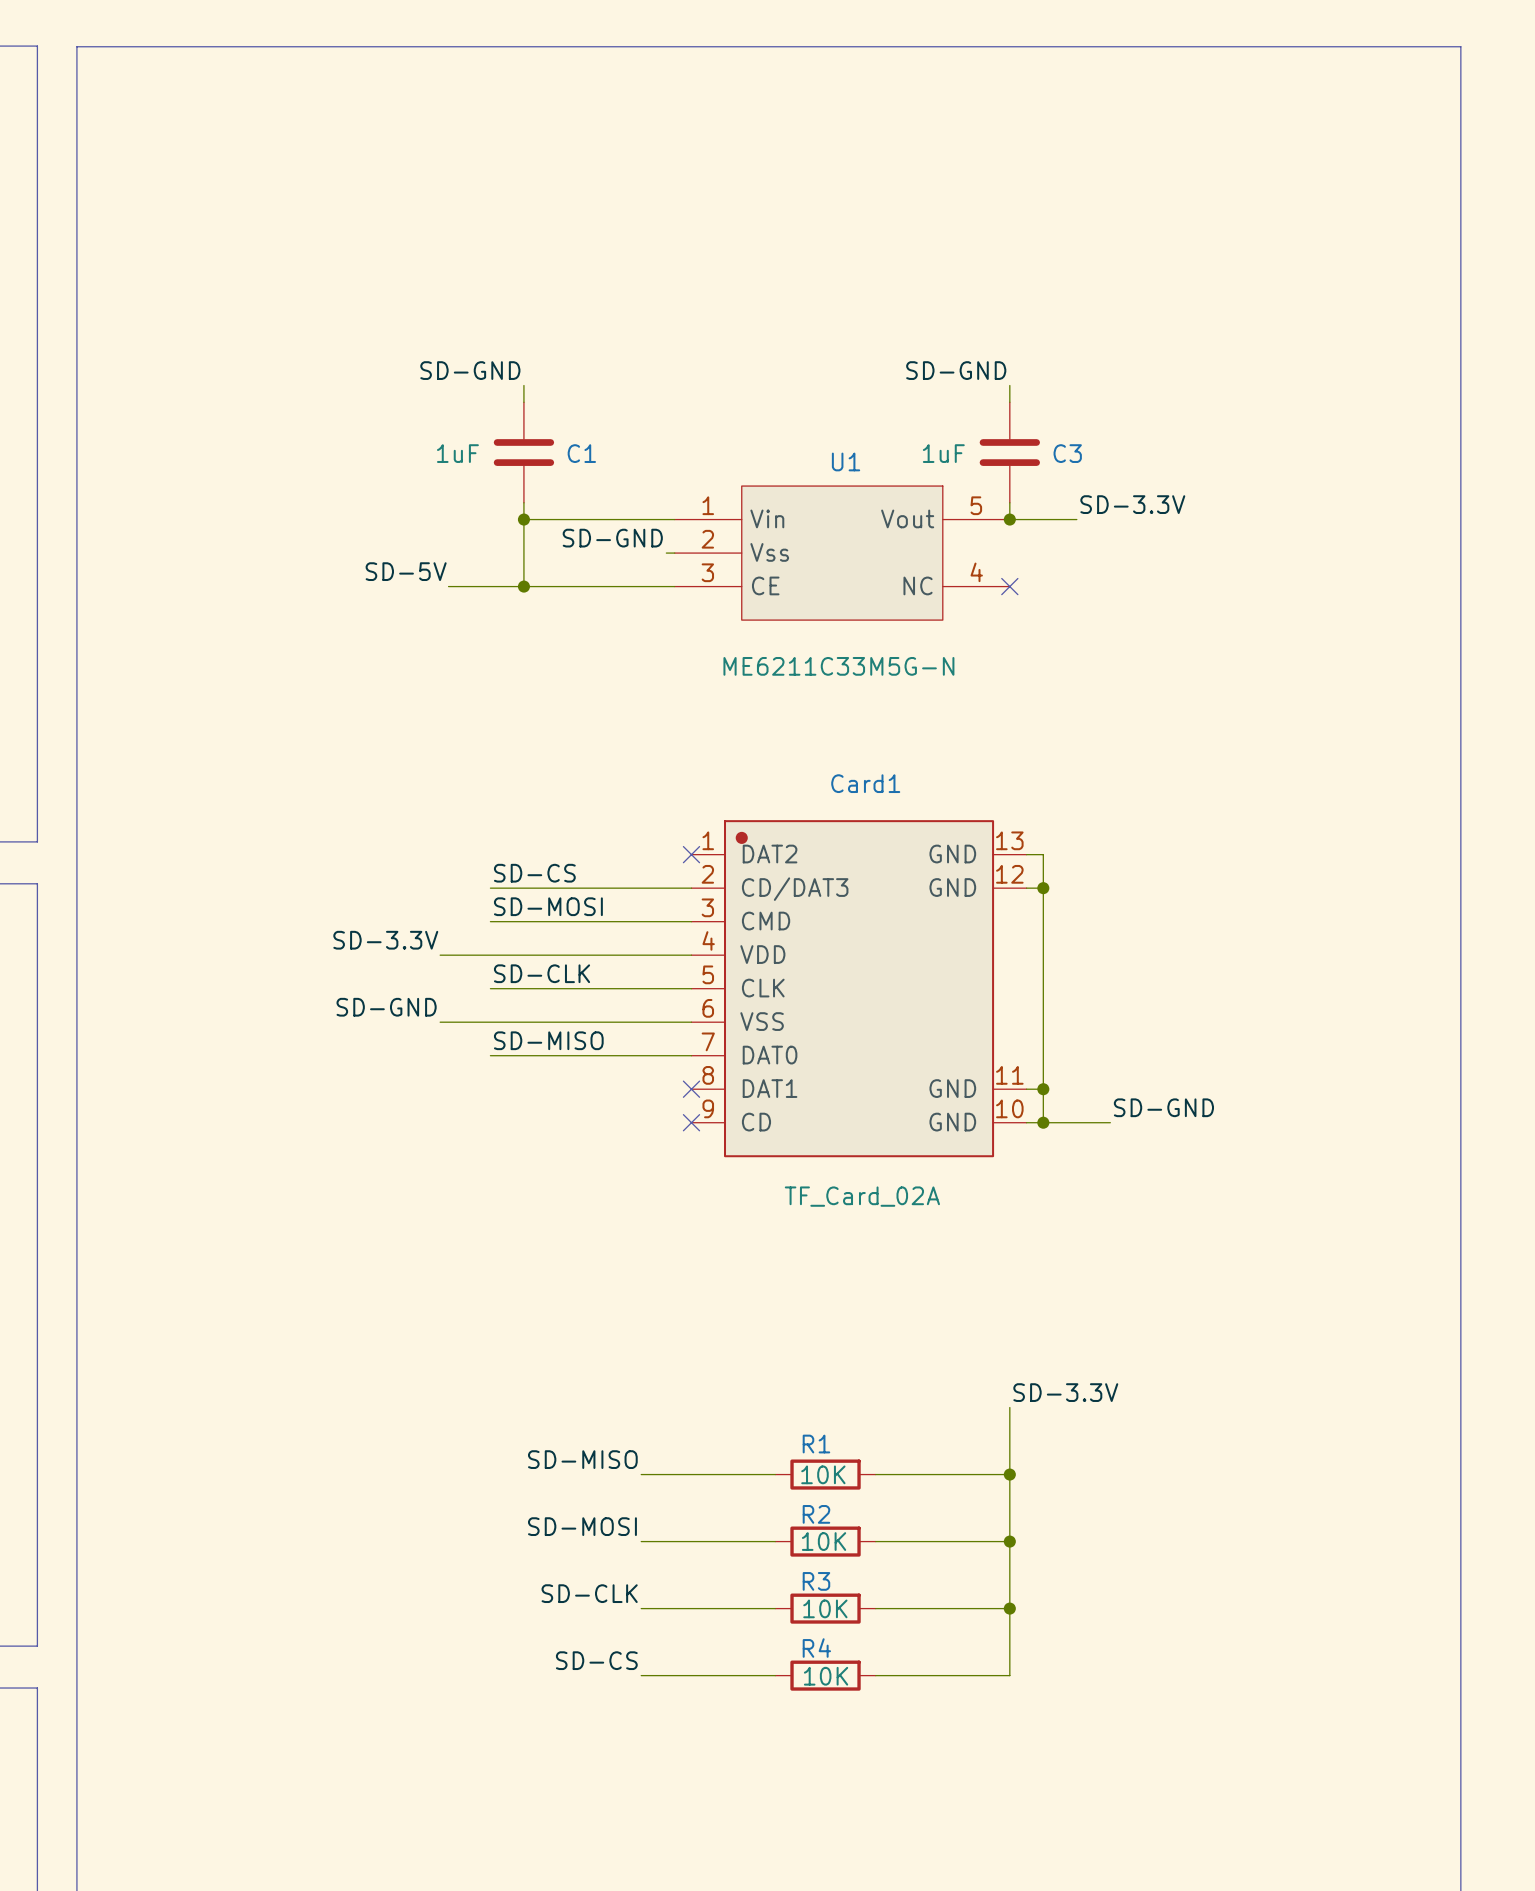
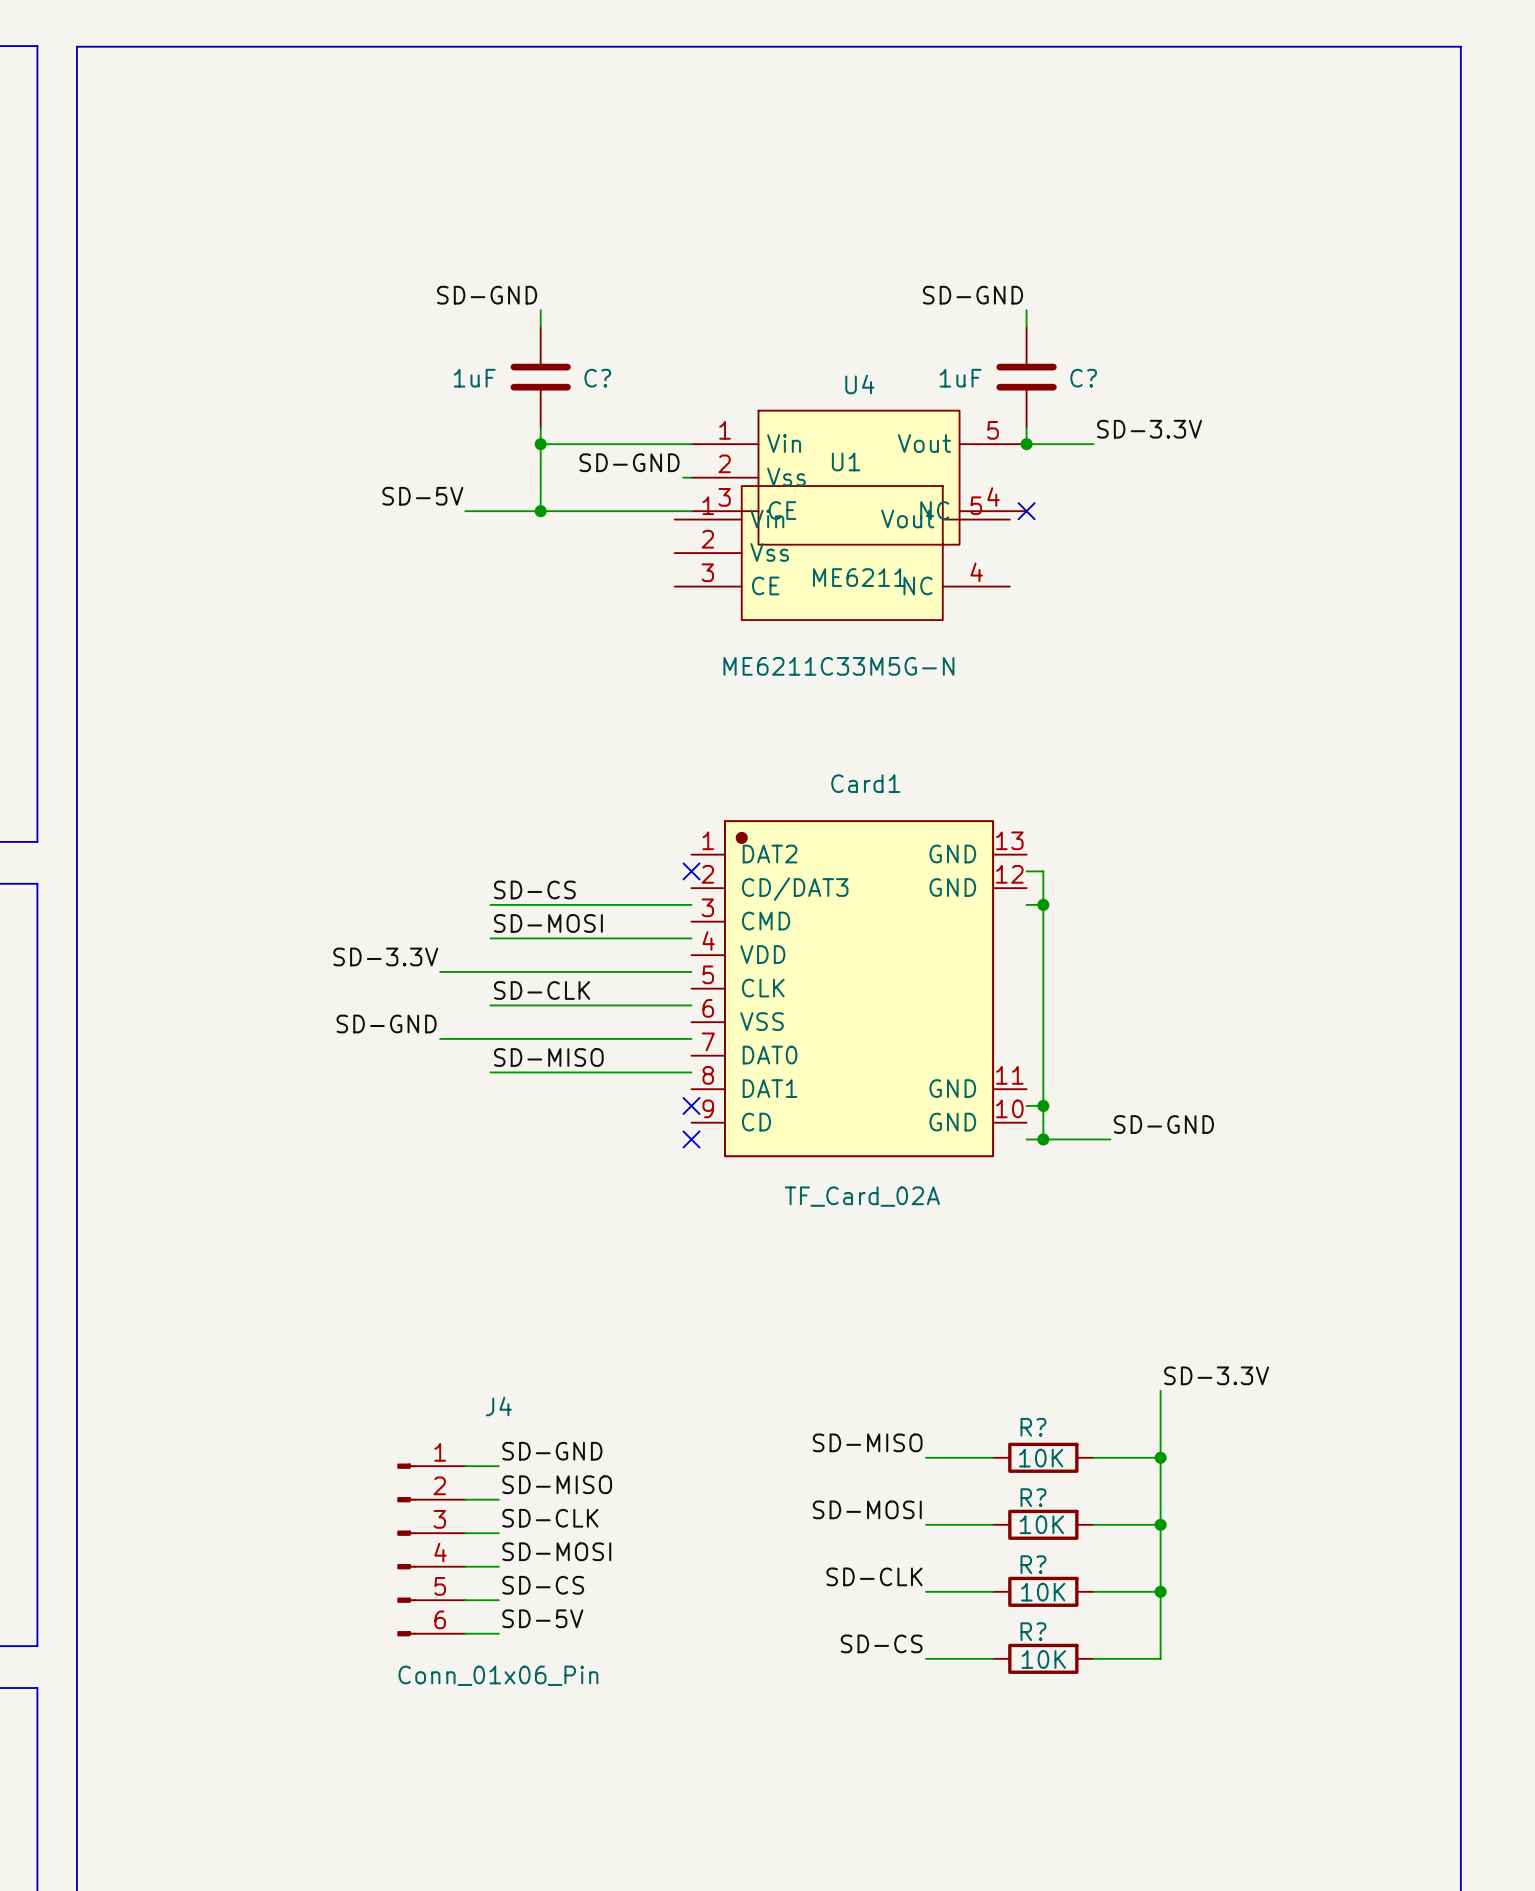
label position: SD-GND (470, 370) -> SD-GND (487, 295)
label position: SD-GND (956, 370) -> SD-GND (972, 295)
C?: none -> 1uF (540, 377)
C?: none -> 1uF (1026, 377)
wire: (523, 385) (523, 402) -> (540, 310) (540, 326)
wire: (1009, 385) (1009, 402) -> (1026, 310) (1026, 326)
junction: none -> (540, 444)
C1: 1uF (523, 452) -> none
C3: 1uF (1009, 452) -> none
U4: none -> ME6211 (859, 477)
wire: (523, 502) (523, 586) -> (540, 427) (540, 511)
wire: (1009, 502) (1009, 519) (1076, 519) -> (1026, 427) (1026, 444) (1093, 444)
label position: SD-3.3V (1132, 504) -> SD-3.3V (1149, 429)
wire: (523, 519) (674, 519) -> (540, 444) (691, 444)
junction position: (523, 519) -> (540, 511)
junction position: (1009, 519) -> (1026, 444)
label position: SD-GND (612, 538) -> SD-GND (629, 462)
wire: (666, 553) (674, 553) -> (683, 477) (691, 477)
label position: SD-5V (406, 571) -> SD-5V (422, 496)
wire: (448, 586) (674, 586) -> (465, 511) (691, 511)
junction: (523, 586) -> none
no-connect mark position: (1009, 586) -> (1026, 511)
no-connect mark position: (691, 854) -> (691, 871)
wire: (1026, 854) (1043, 854) (1043, 871) -> (1026, 871) (1043, 871)
label position: SD-CS (534, 873) -> SD-CS (534, 889)
wire: (490, 888) (691, 888) -> (490, 904) (691, 904)
wire: (1026, 888) (1043, 888) -> (1026, 904) (1043, 904)
junction position: (1043, 888) -> (1043, 904)
label position: SD-MOSI (548, 906) -> SD-MOSI (548, 923)
wire: (490, 921) (691, 921) -> (490, 938) (691, 938)
label position: SD-3.3V (385, 940) -> SD-3.3V (385, 956)
wire: (440, 955) (691, 955) -> (440, 971) (691, 971)
label position: SD-CLK (542, 973) -> SD-CLK (542, 990)
wire: (490, 988) (691, 988) -> (490, 1005) (691, 1005)
label position: SD-GND (386, 1007) -> SD-GND (386, 1023)
wire: (440, 1022) (691, 1022) -> (440, 1038) (691, 1038)
label position: SD-MISO (548, 1040) -> SD-MISO (548, 1057)
wire: (490, 1055) (691, 1055) -> (490, 1072) (691, 1072)
no-connect mark: (691, 1089) -> none
wire: (1026, 1089) (1043, 1089) -> (1026, 1105) (1043, 1105)
junction: (1043, 1089) -> none
no-connect mark: none -> (691, 1105)
junction: none -> (1043, 1105)
label position: SD-GND (1163, 1107) -> SD-GND (1163, 1124)
no-connect mark: (691, 1122) -> none
wire: (1026, 1122) (1110, 1122) -> (1026, 1139) (1110, 1139)
wire: none -> (1043, 1122) (1043, 1139)
junction: (1043, 1122) -> none
no-connect mark: none -> (691, 1139)
junction: none -> (1043, 1139)
wire: none -> (1160, 1390) (1160, 1658) (1093, 1658)
label position: SD-3.3V (1065, 1392) -> SD-3.3V (1216, 1375)
wire: (1009, 1407) (1009, 1675) (875, 1675) -> none
label: none -> SD-MISO (867, 1442)
label: none -> SD-GND (552, 1451)
wire: none -> (926, 1457) (993, 1457)
R?: none -> 10K (1043, 1457)
wire: none -> (1093, 1457) (1160, 1457)
junction: none -> (1160, 1457)
label position: SD-MISO (582, 1459) -> SD-MISO (557, 1484)
wire: none -> (465, 1466) (498, 1466)
wire: (641, 1474) (775, 1474) -> none
R1: 10K (825, 1474) -> none
wire: (875, 1474) (1009, 1474) -> none
junction: (1009, 1474) -> none
wire: none -> (465, 1499) (498, 1499)
label: none -> SD-MOSI (867, 1509)
label: none -> SD-CLK (550, 1518)
wire: none -> (926, 1524) (993, 1524)
R?: none -> 10K (1043, 1524)
wire: none -> (1093, 1524) (1160, 1524)
junction: none -> (1160, 1524)
label position: SD-MOSI (582, 1526) -> SD-MOSI (556, 1551)
wire: none -> (465, 1533) (498, 1533)
wire: (641, 1541) (775, 1541) -> none
R2: 10K (825, 1541) -> none
wire: (875, 1541) (1009, 1541) -> none
junction: (1009, 1541) -> none
J4: none -> Conn_01x06_Pin (431, 1549)
wire: none -> (465, 1566) (498, 1566)
label: none -> SD-CLK (874, 1576)
wire: none -> (926, 1591) (993, 1591)
R?: none -> 10K (1043, 1591)
wire: none -> (1093, 1591) (1160, 1591)
junction: none -> (1160, 1591)
label: SD-CLK (589, 1593) -> SD-CS (543, 1585)
wire: none -> (465, 1600) (498, 1600)
wire: (641, 1608) (775, 1608) -> none
R3: 10K (825, 1608) -> none
wire: (875, 1608) (1009, 1608) -> none
junction: (1009, 1608) -> none
label: none -> SD-5V (542, 1618)
wire: none -> (465, 1633) (498, 1633)
label: none -> SD-CS (881, 1643)
wire: none -> (926, 1658) (993, 1658)
R?: none -> 10K (1043, 1658)
label: SD-CS (596, 1660) -> none
wire: (641, 1675) (775, 1675) -> none
R4: 10K (825, 1675) -> none

